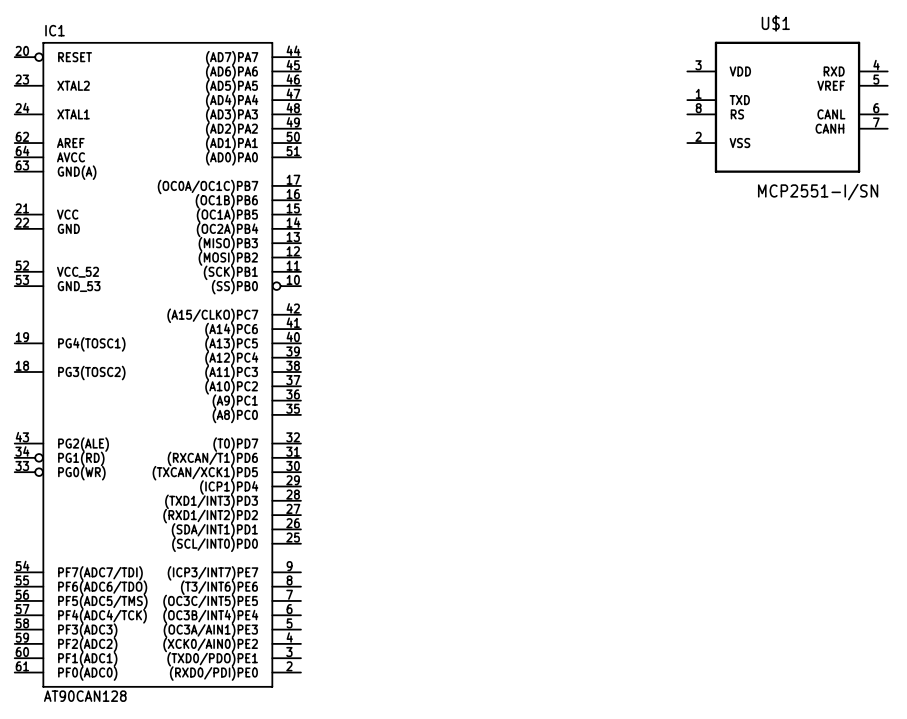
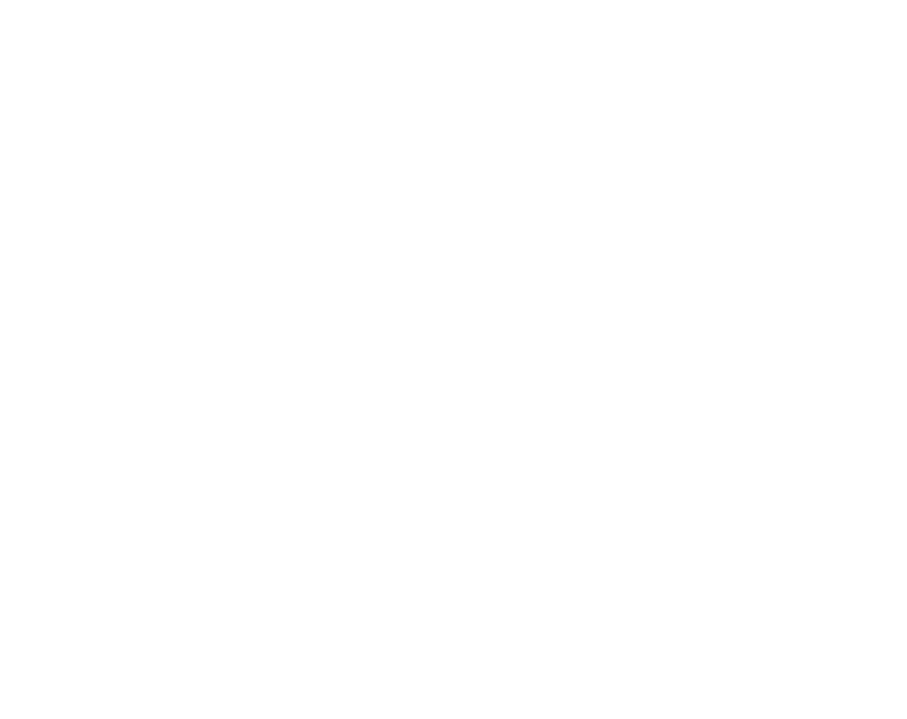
U$1: MCP2551-I/SN (787, 107) -> none
IC1: AT90CAN128 (157, 364) -> none

